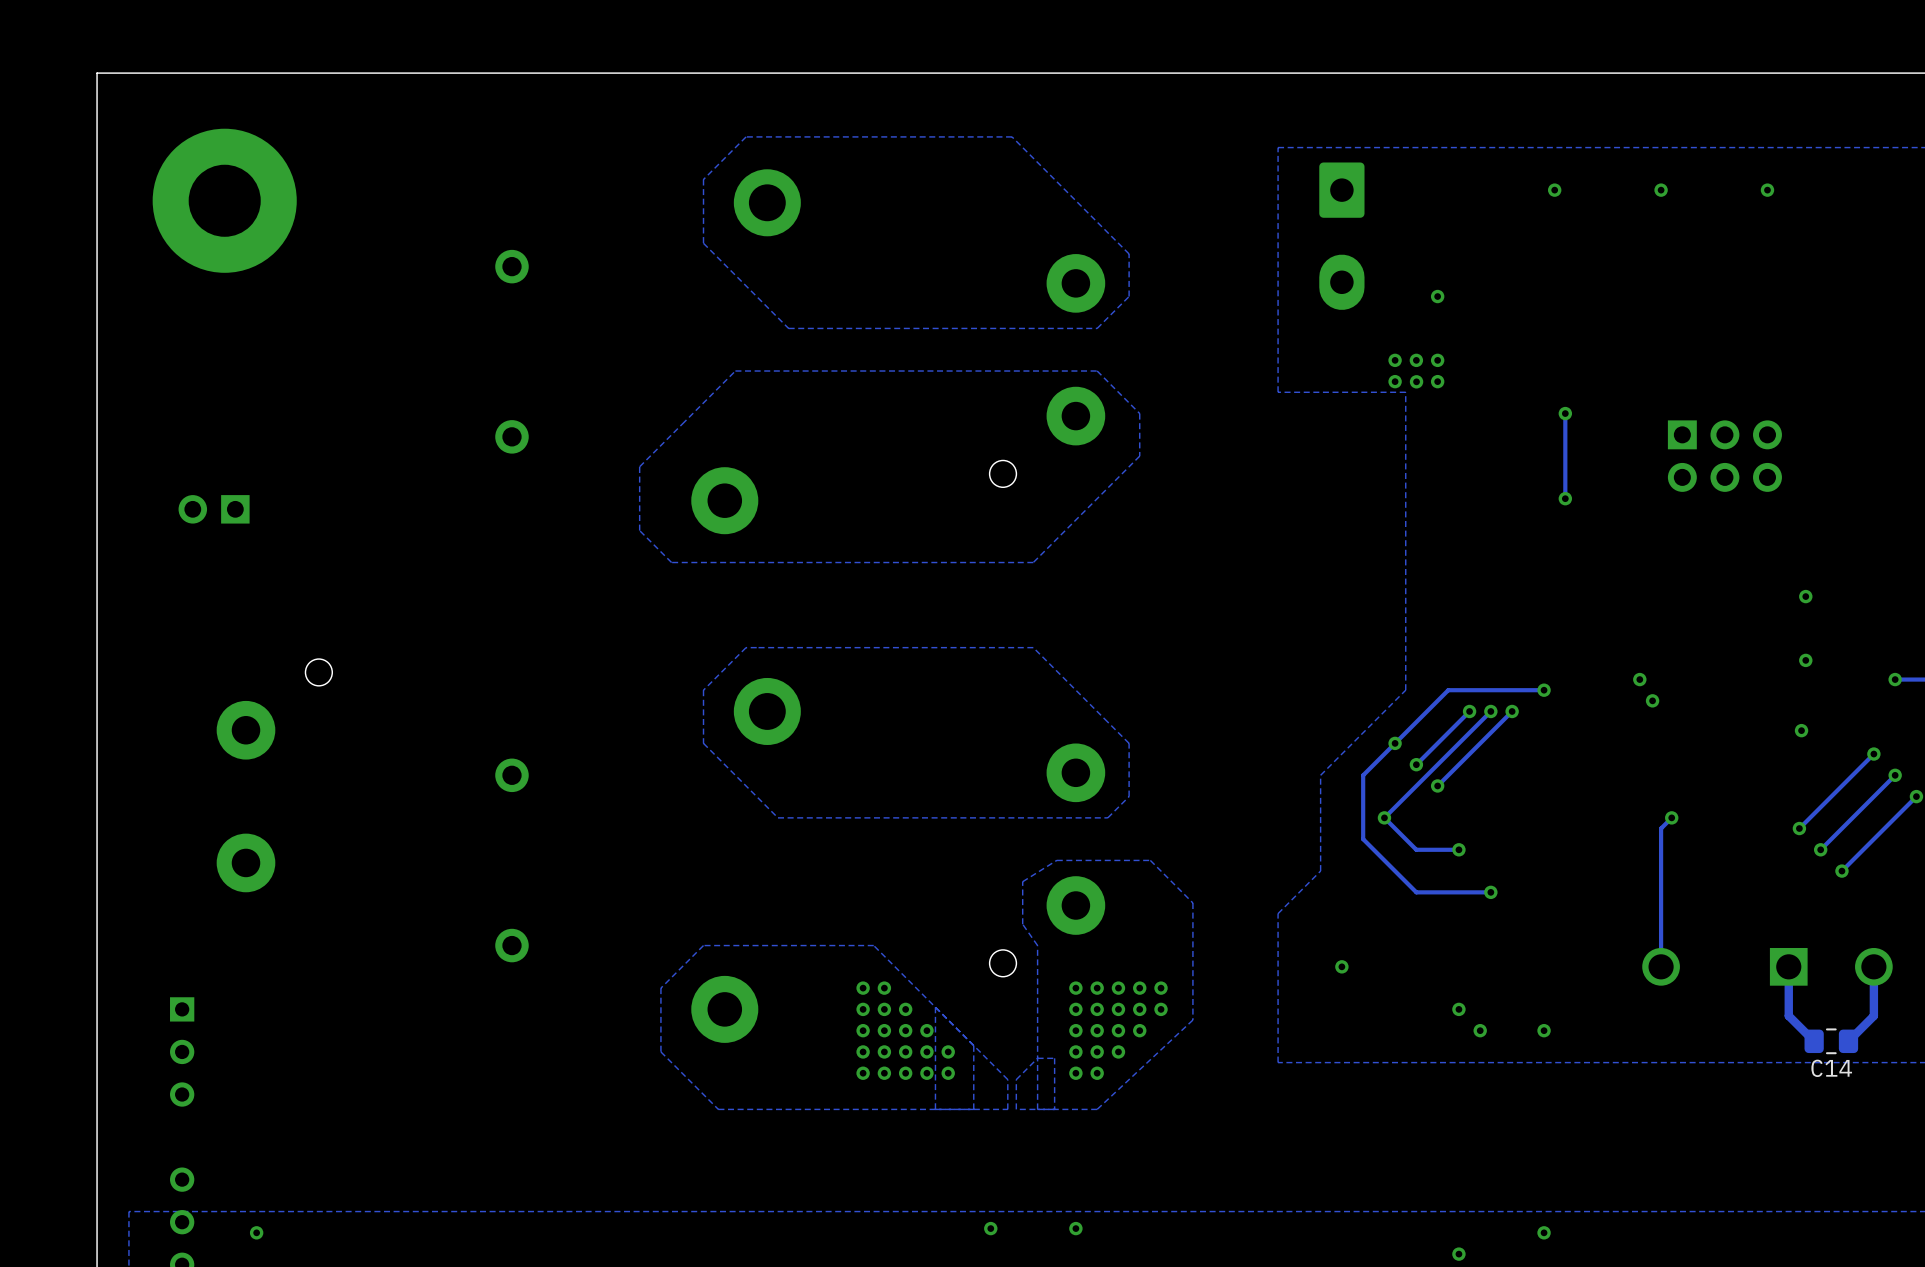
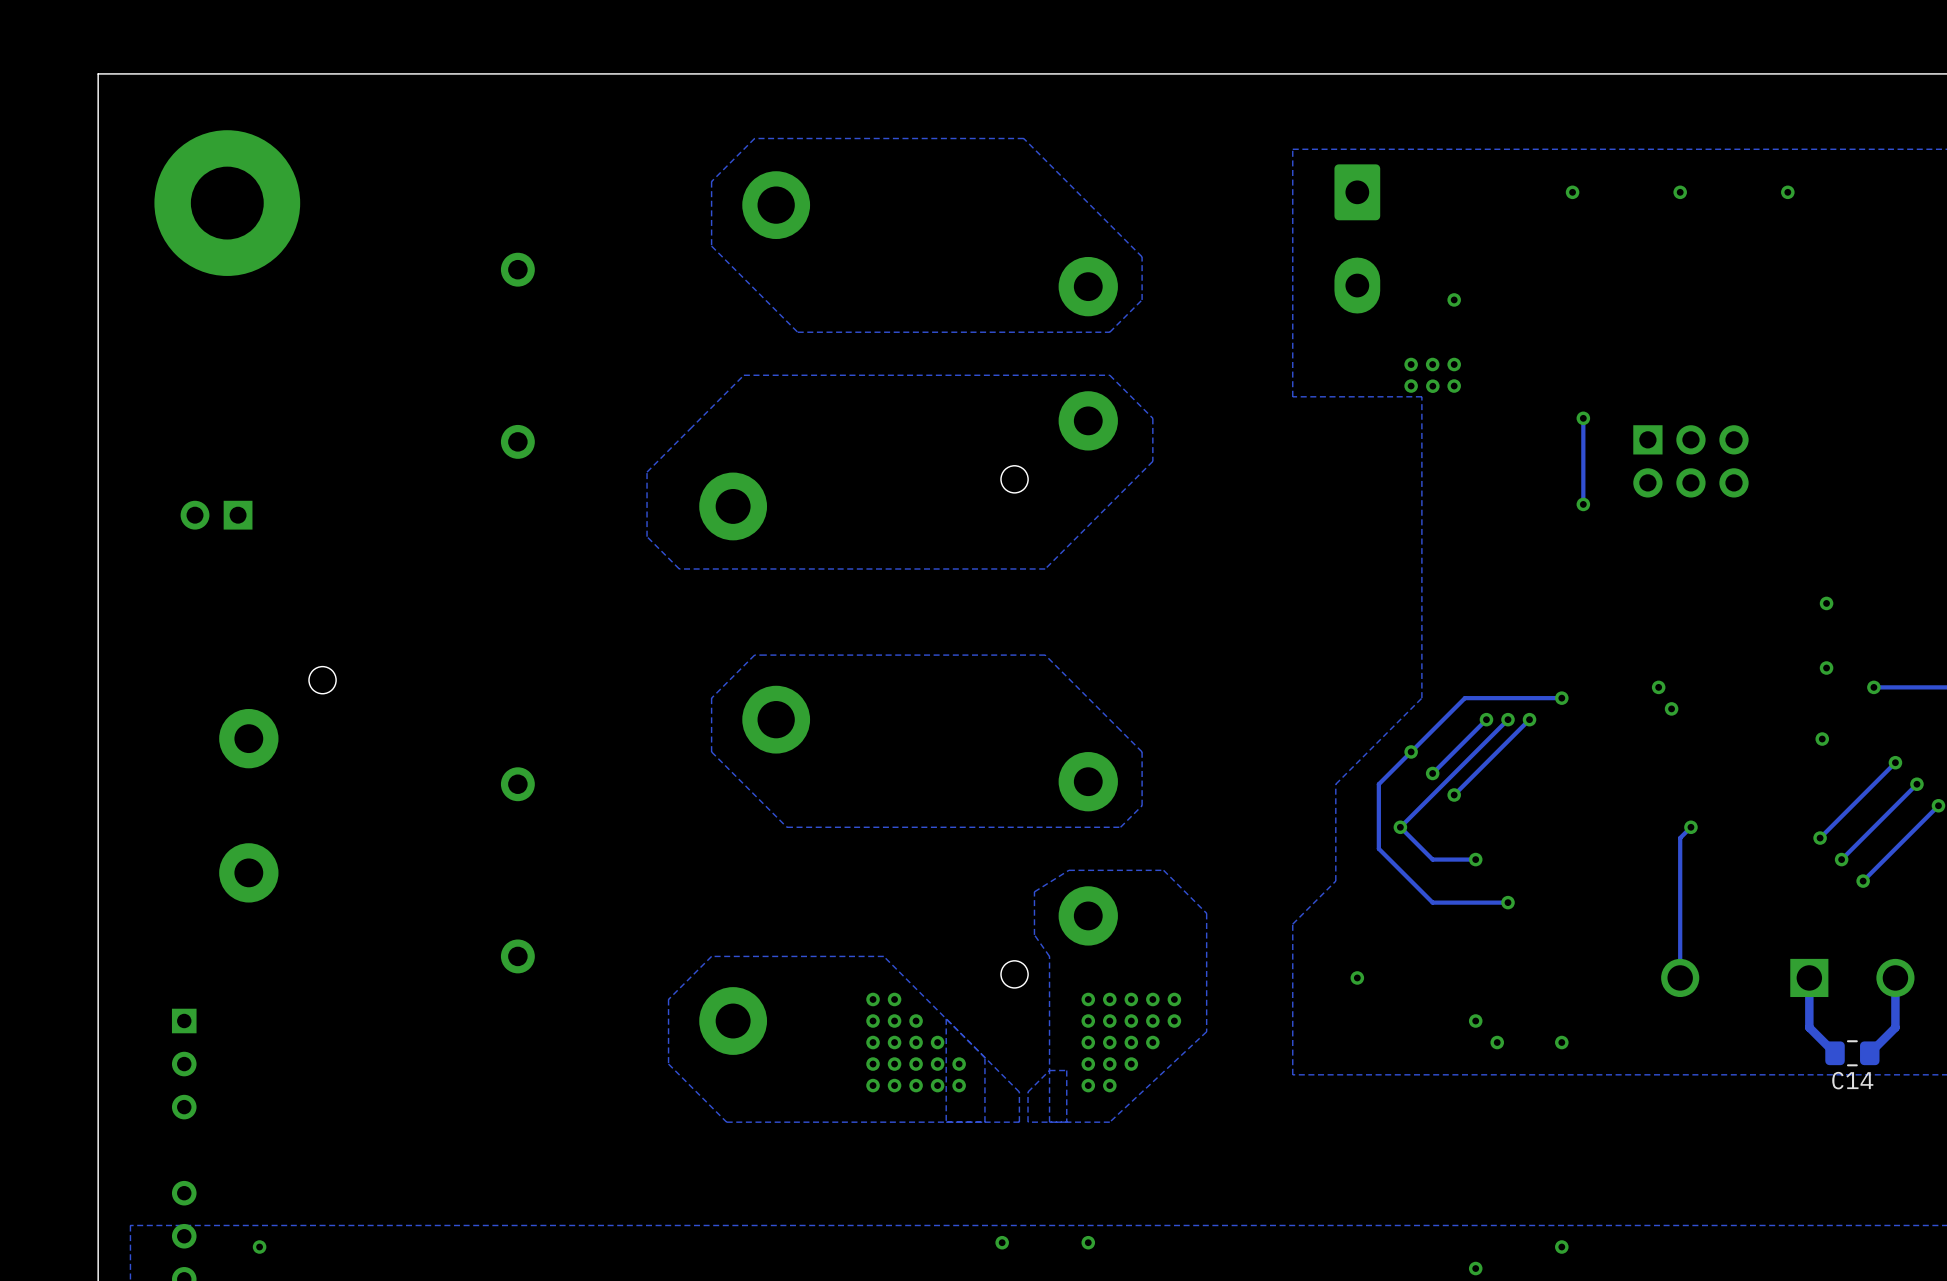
part position: (1724, 456) -> (1690, 461)
via: none -> (1873, 687)
track: none -> (1916, 687) (1873, 687)
via: (1895, 679) -> none

